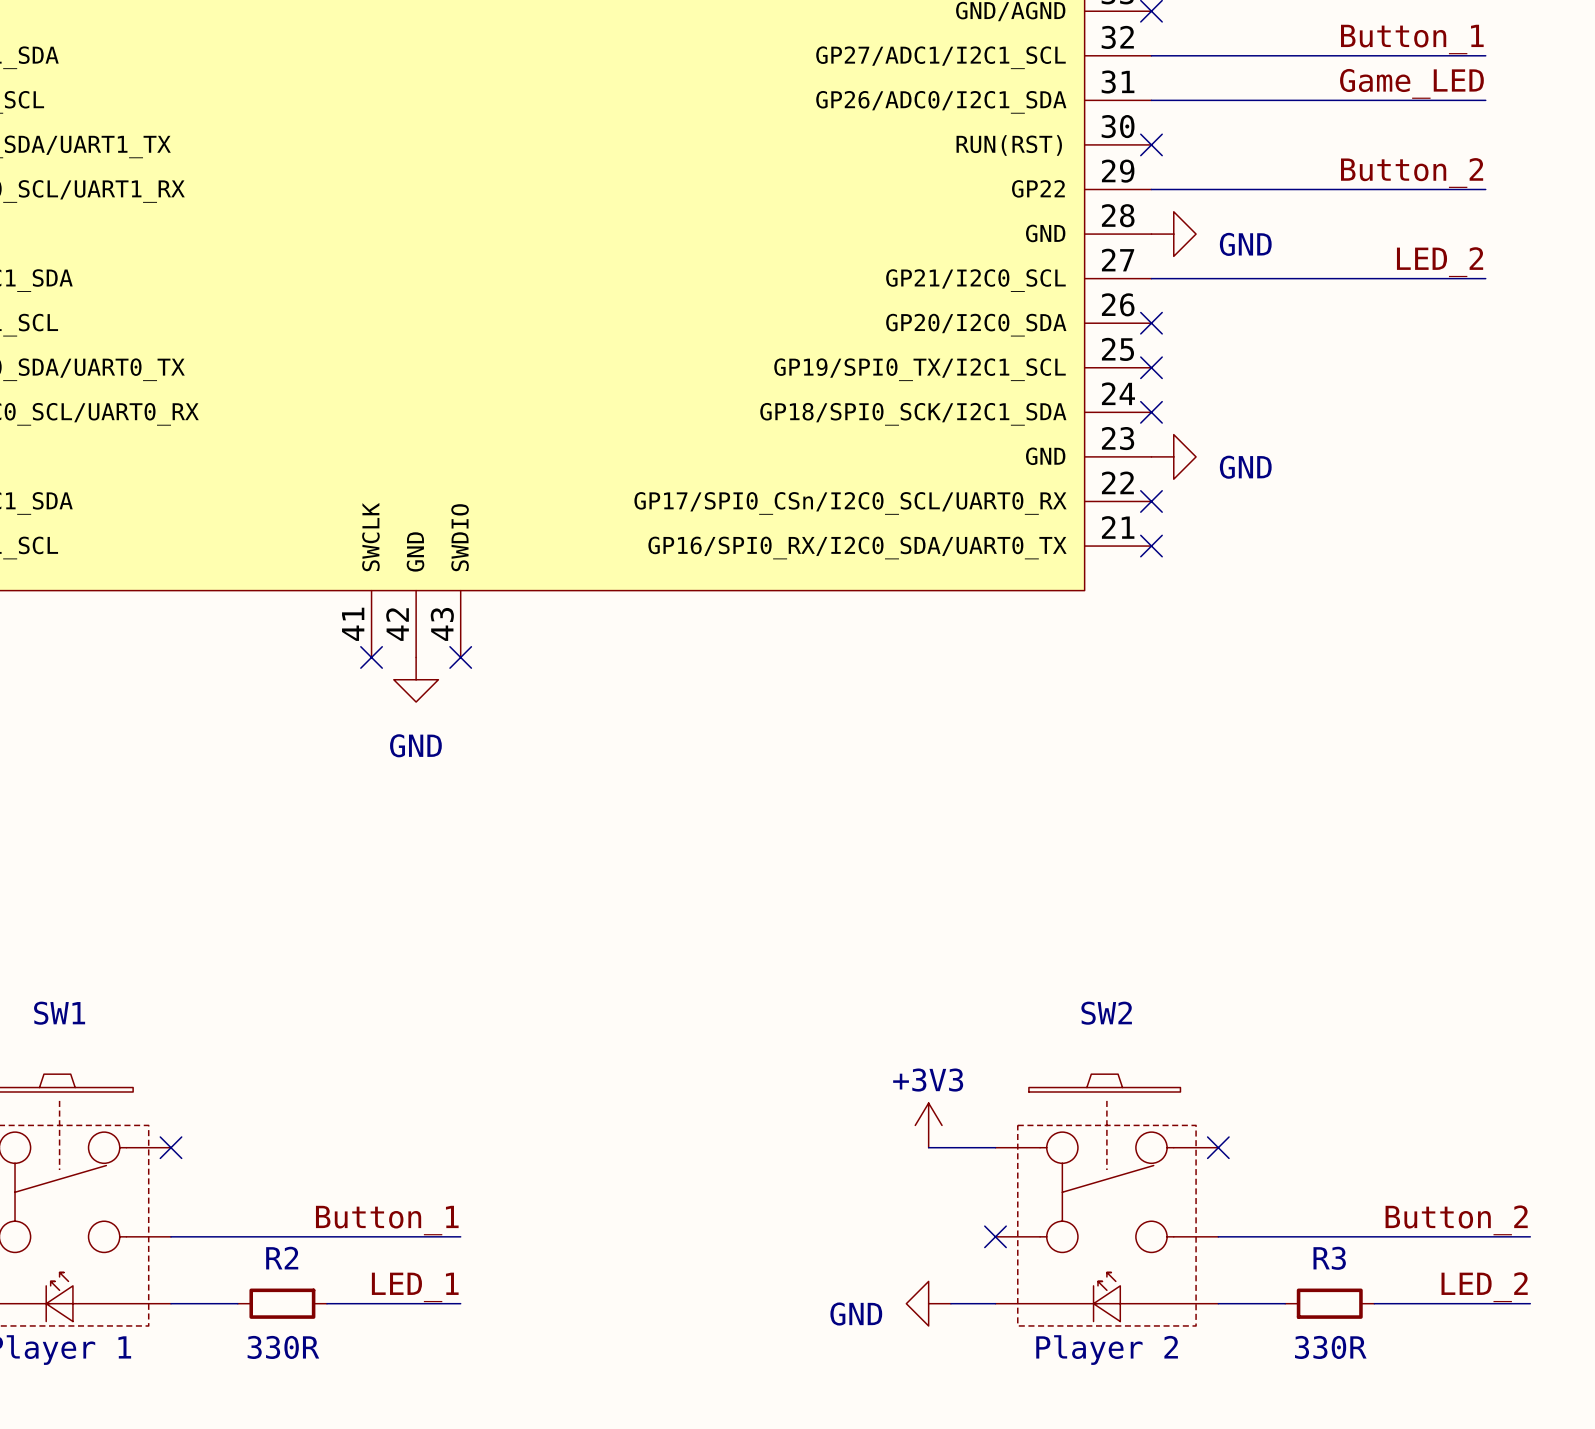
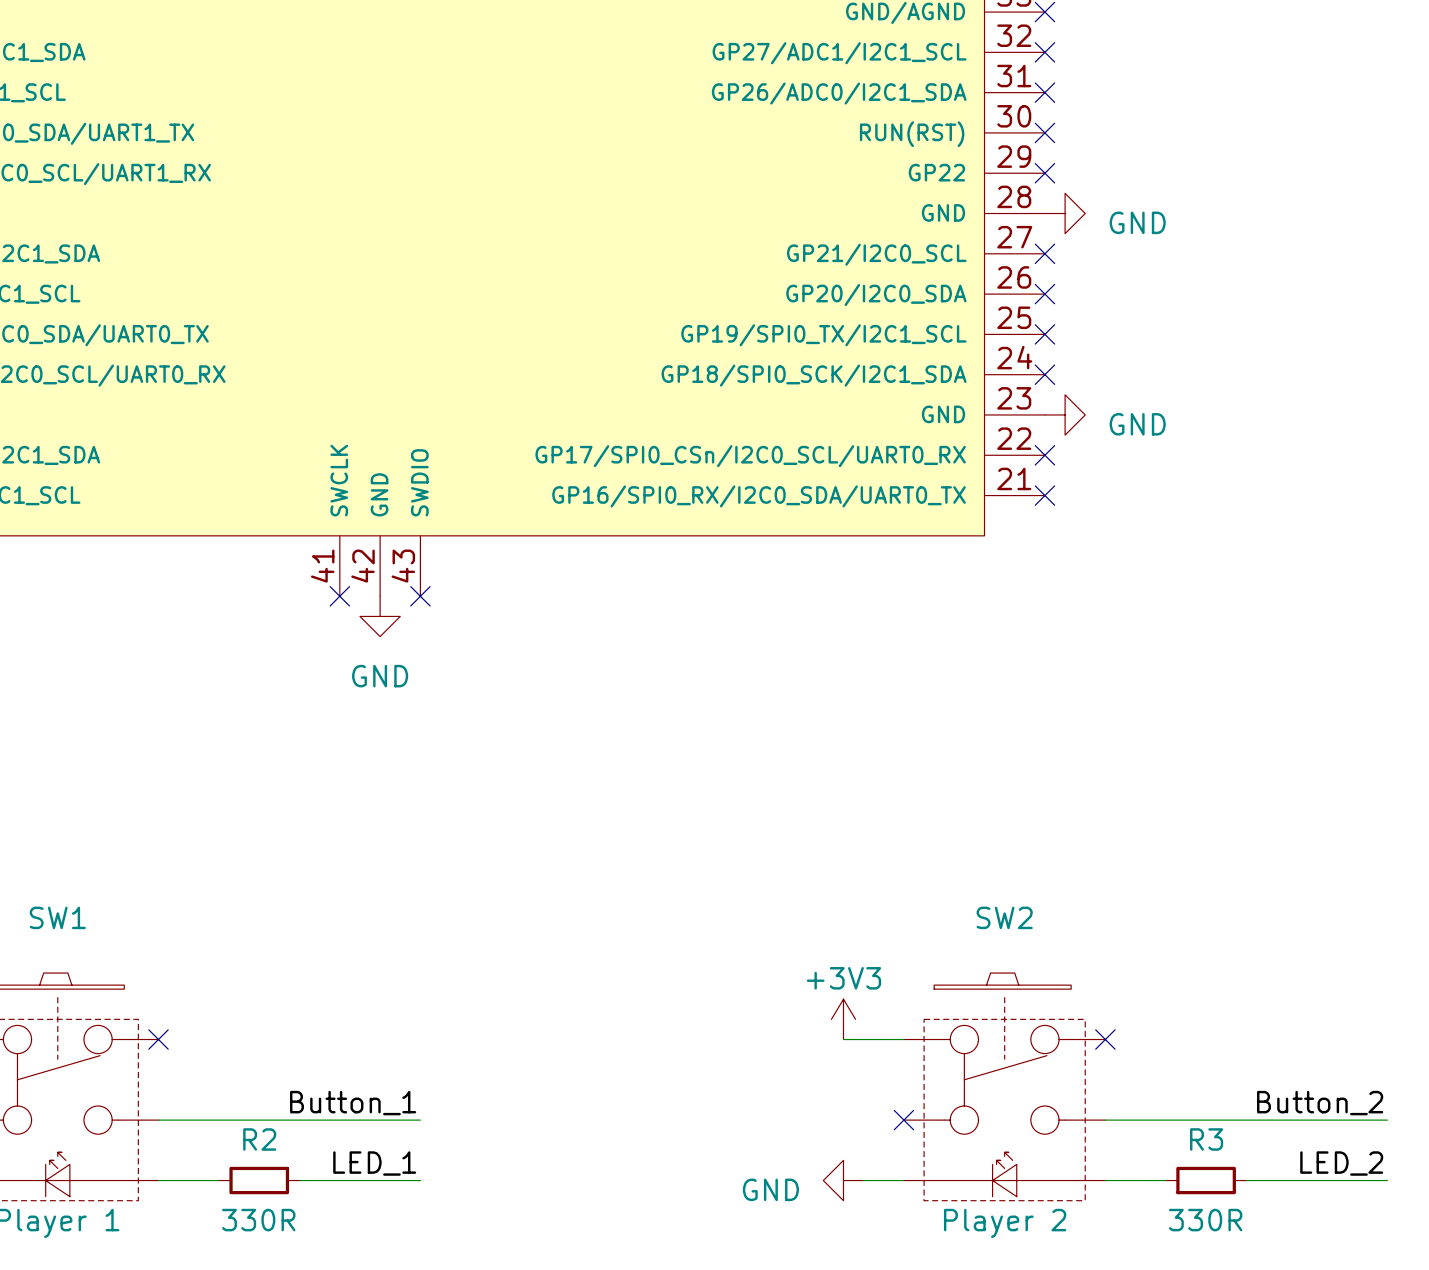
label: Button_1 (1412, 39) -> none
wire: (1151, 55) (1485, 55) -> none
no-connect mark: none -> (1044, 52)
label: Game_LED (1411, 83) -> none
wire: (1151, 100) (1485, 100) -> none
no-connect mark: none -> (1044, 92)
label: Button_2 (1412, 173) -> none
wire: (1151, 189) (1485, 189) -> none
no-connect mark: none -> (1044, 173)
label: LED_2 (1440, 262) -> none
wire: (1151, 278) (1485, 278) -> none
no-connect mark: none -> (1044, 253)

